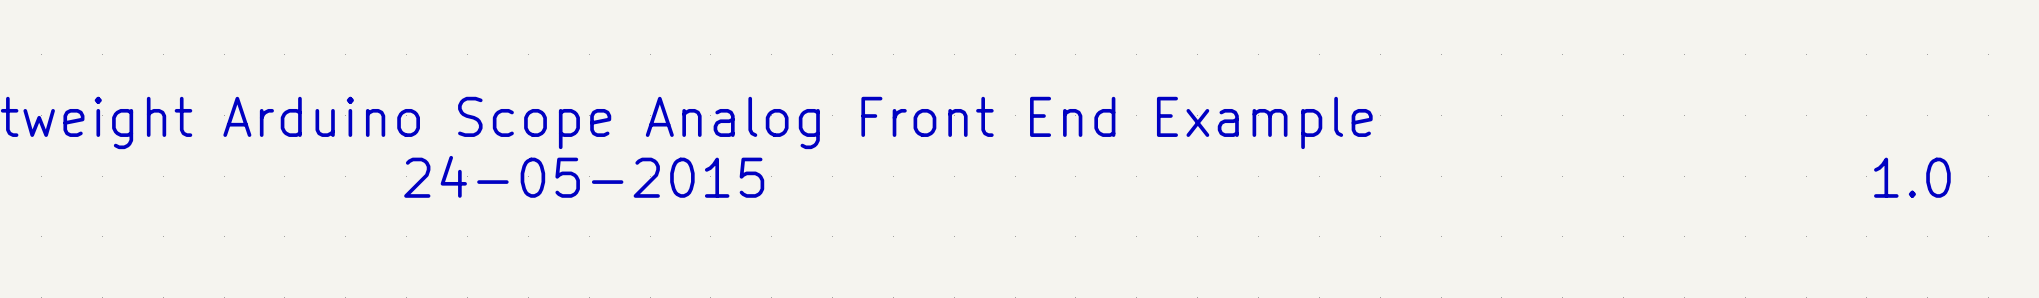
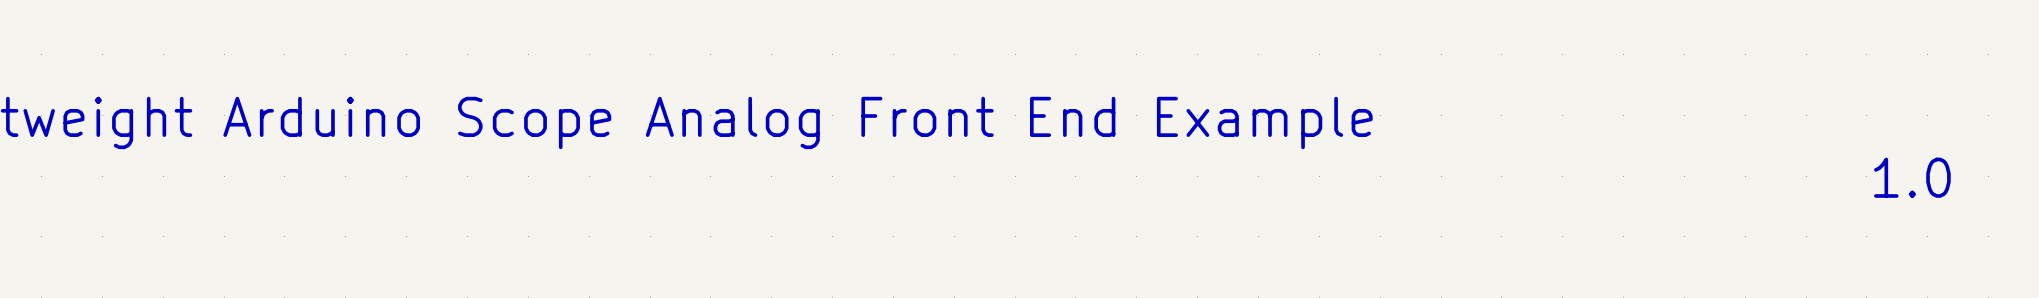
text: 24-05-2015 (584, 176) -> none

